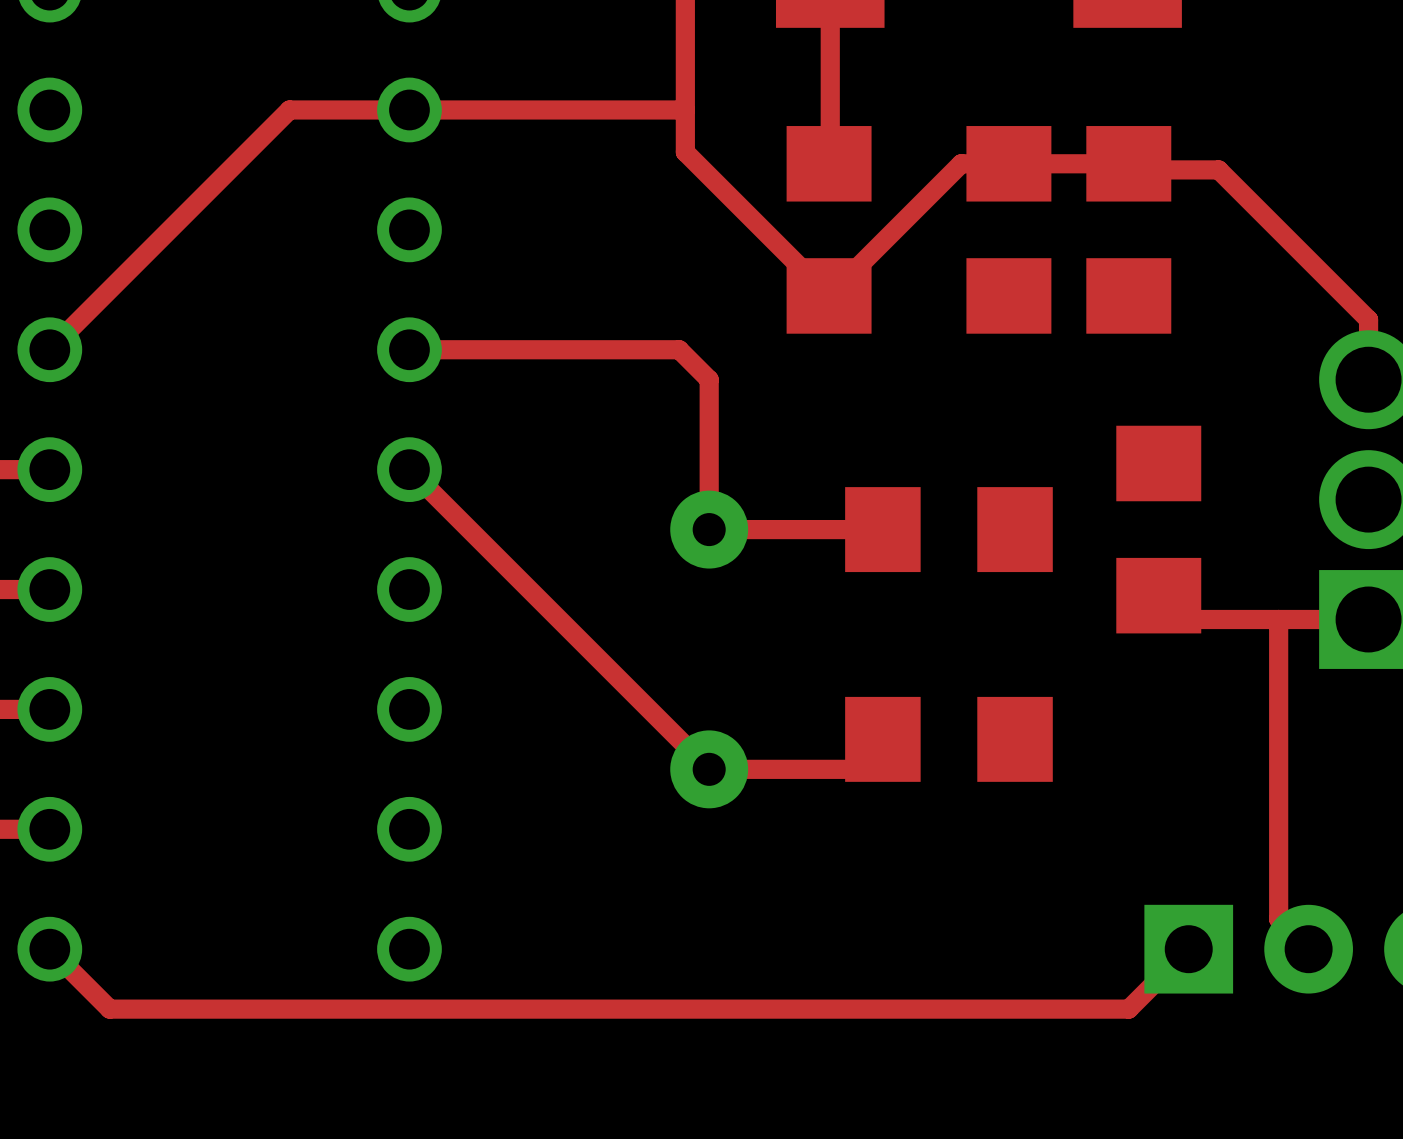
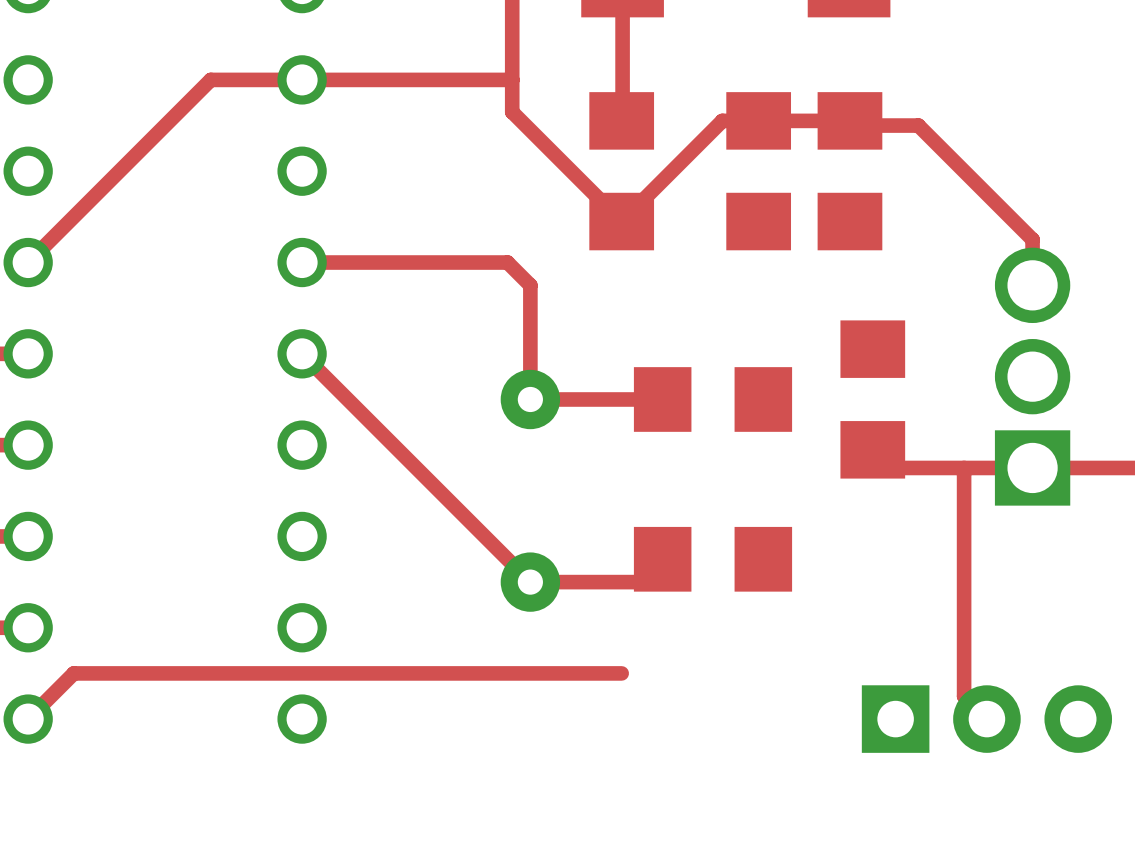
top track: (1188, 949) (1128, 1009) (109, 1009) (49, 949) -> (621, 673) (73, 673) (28, 719)

